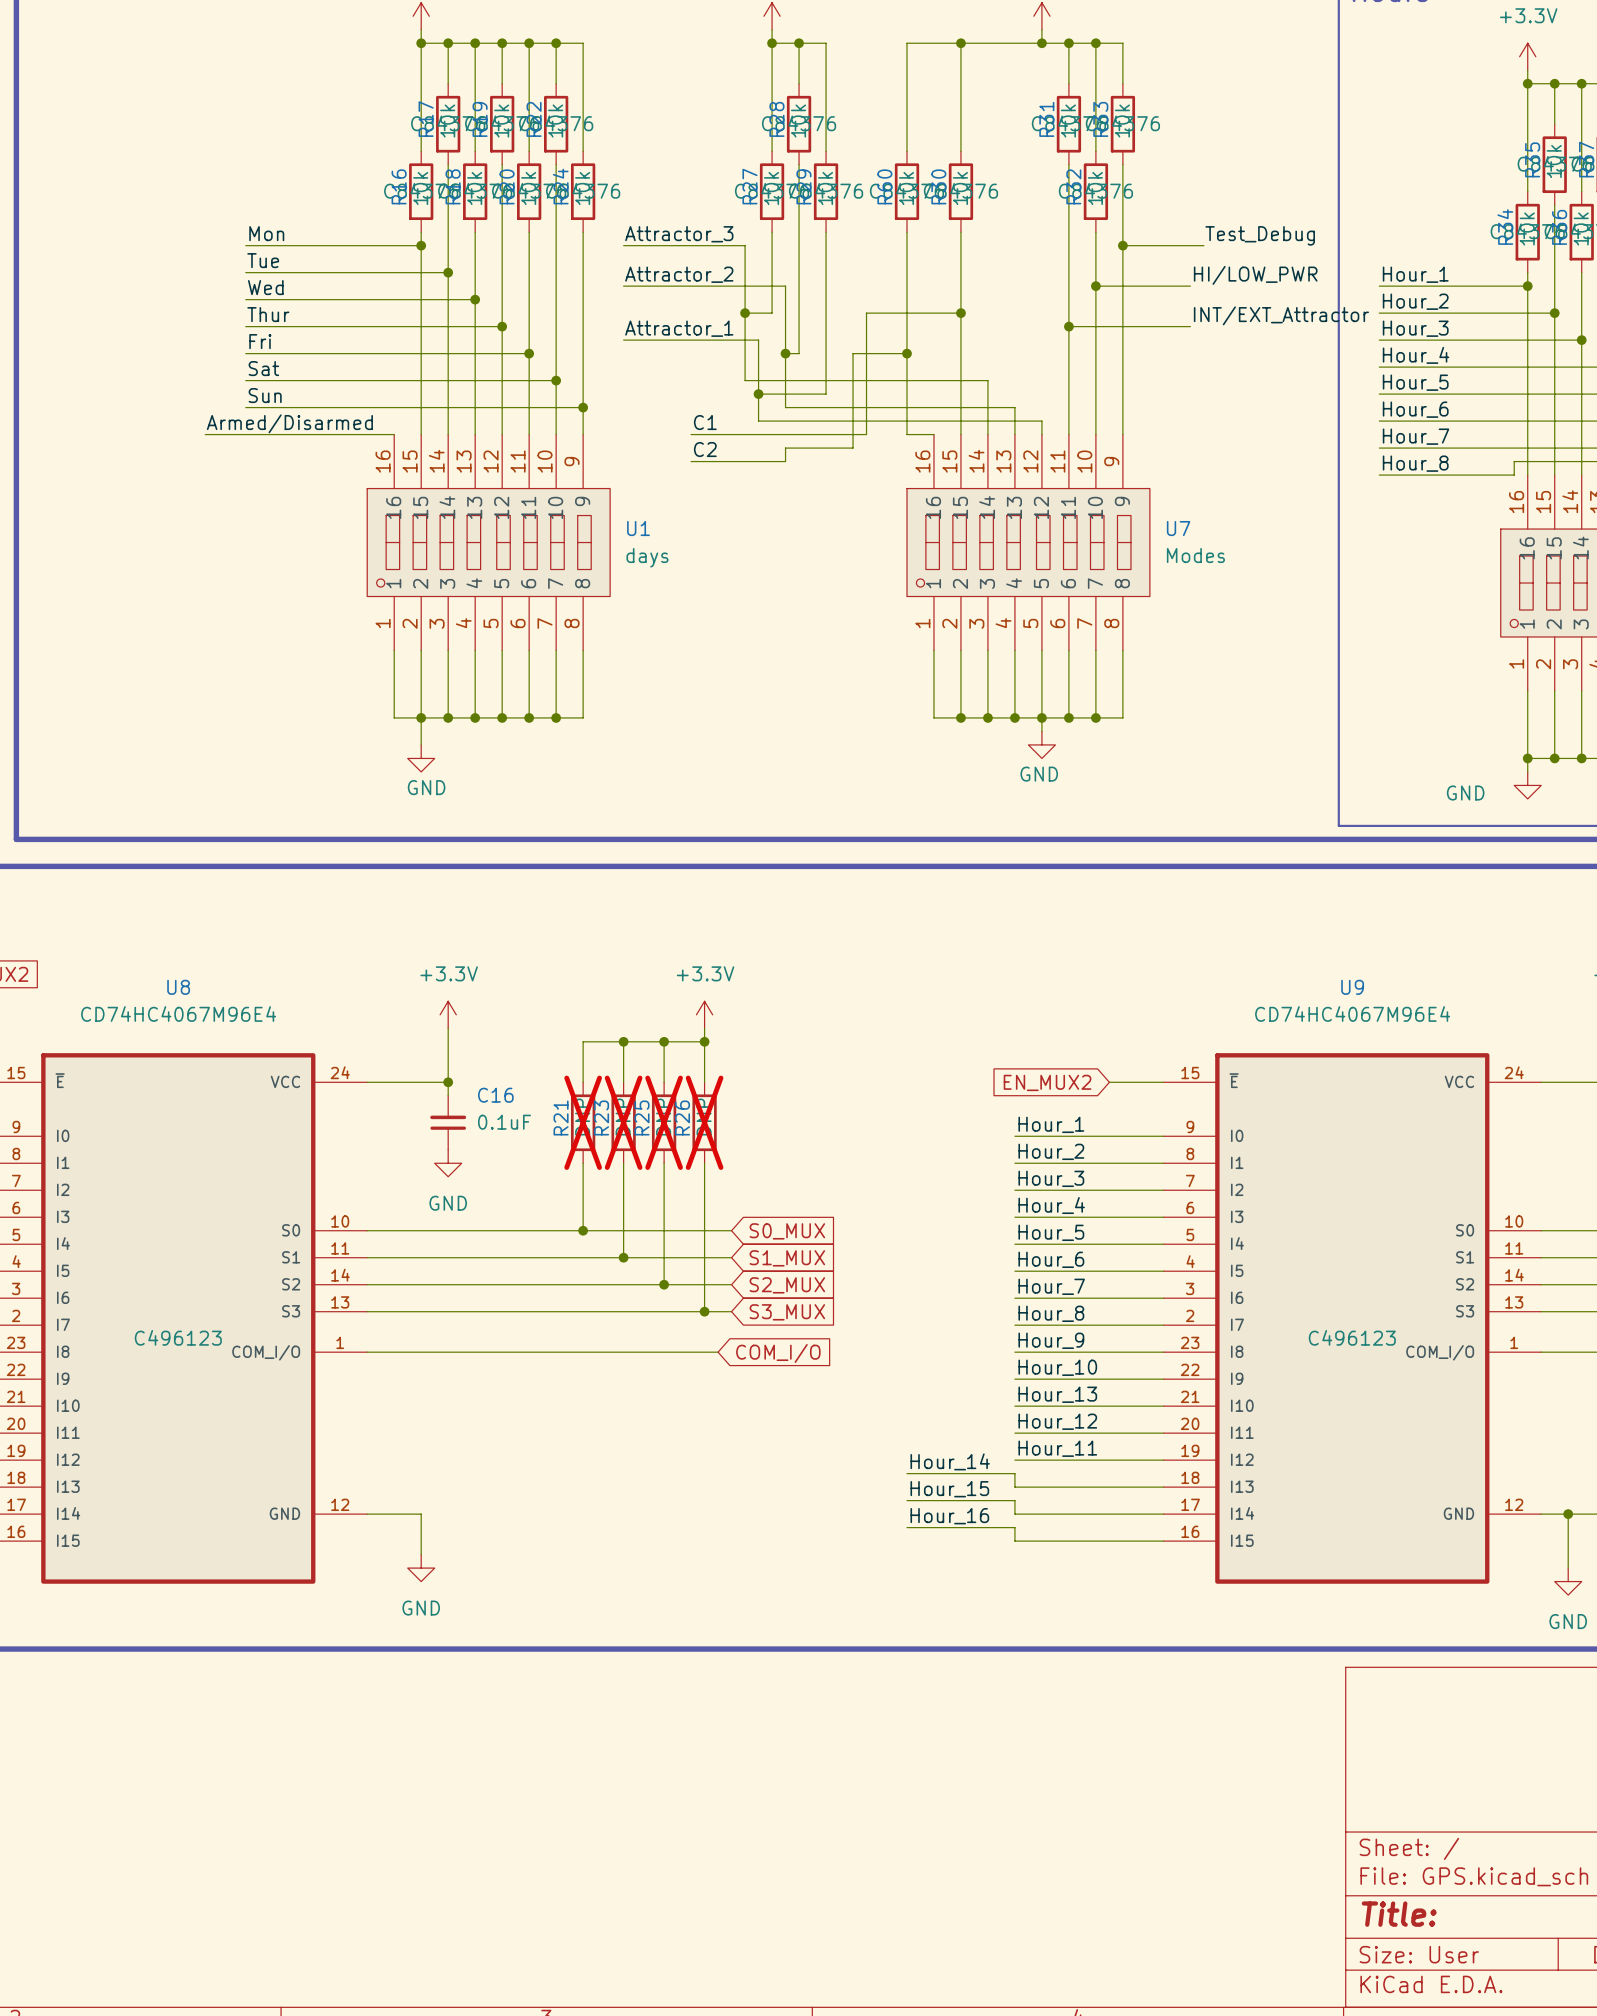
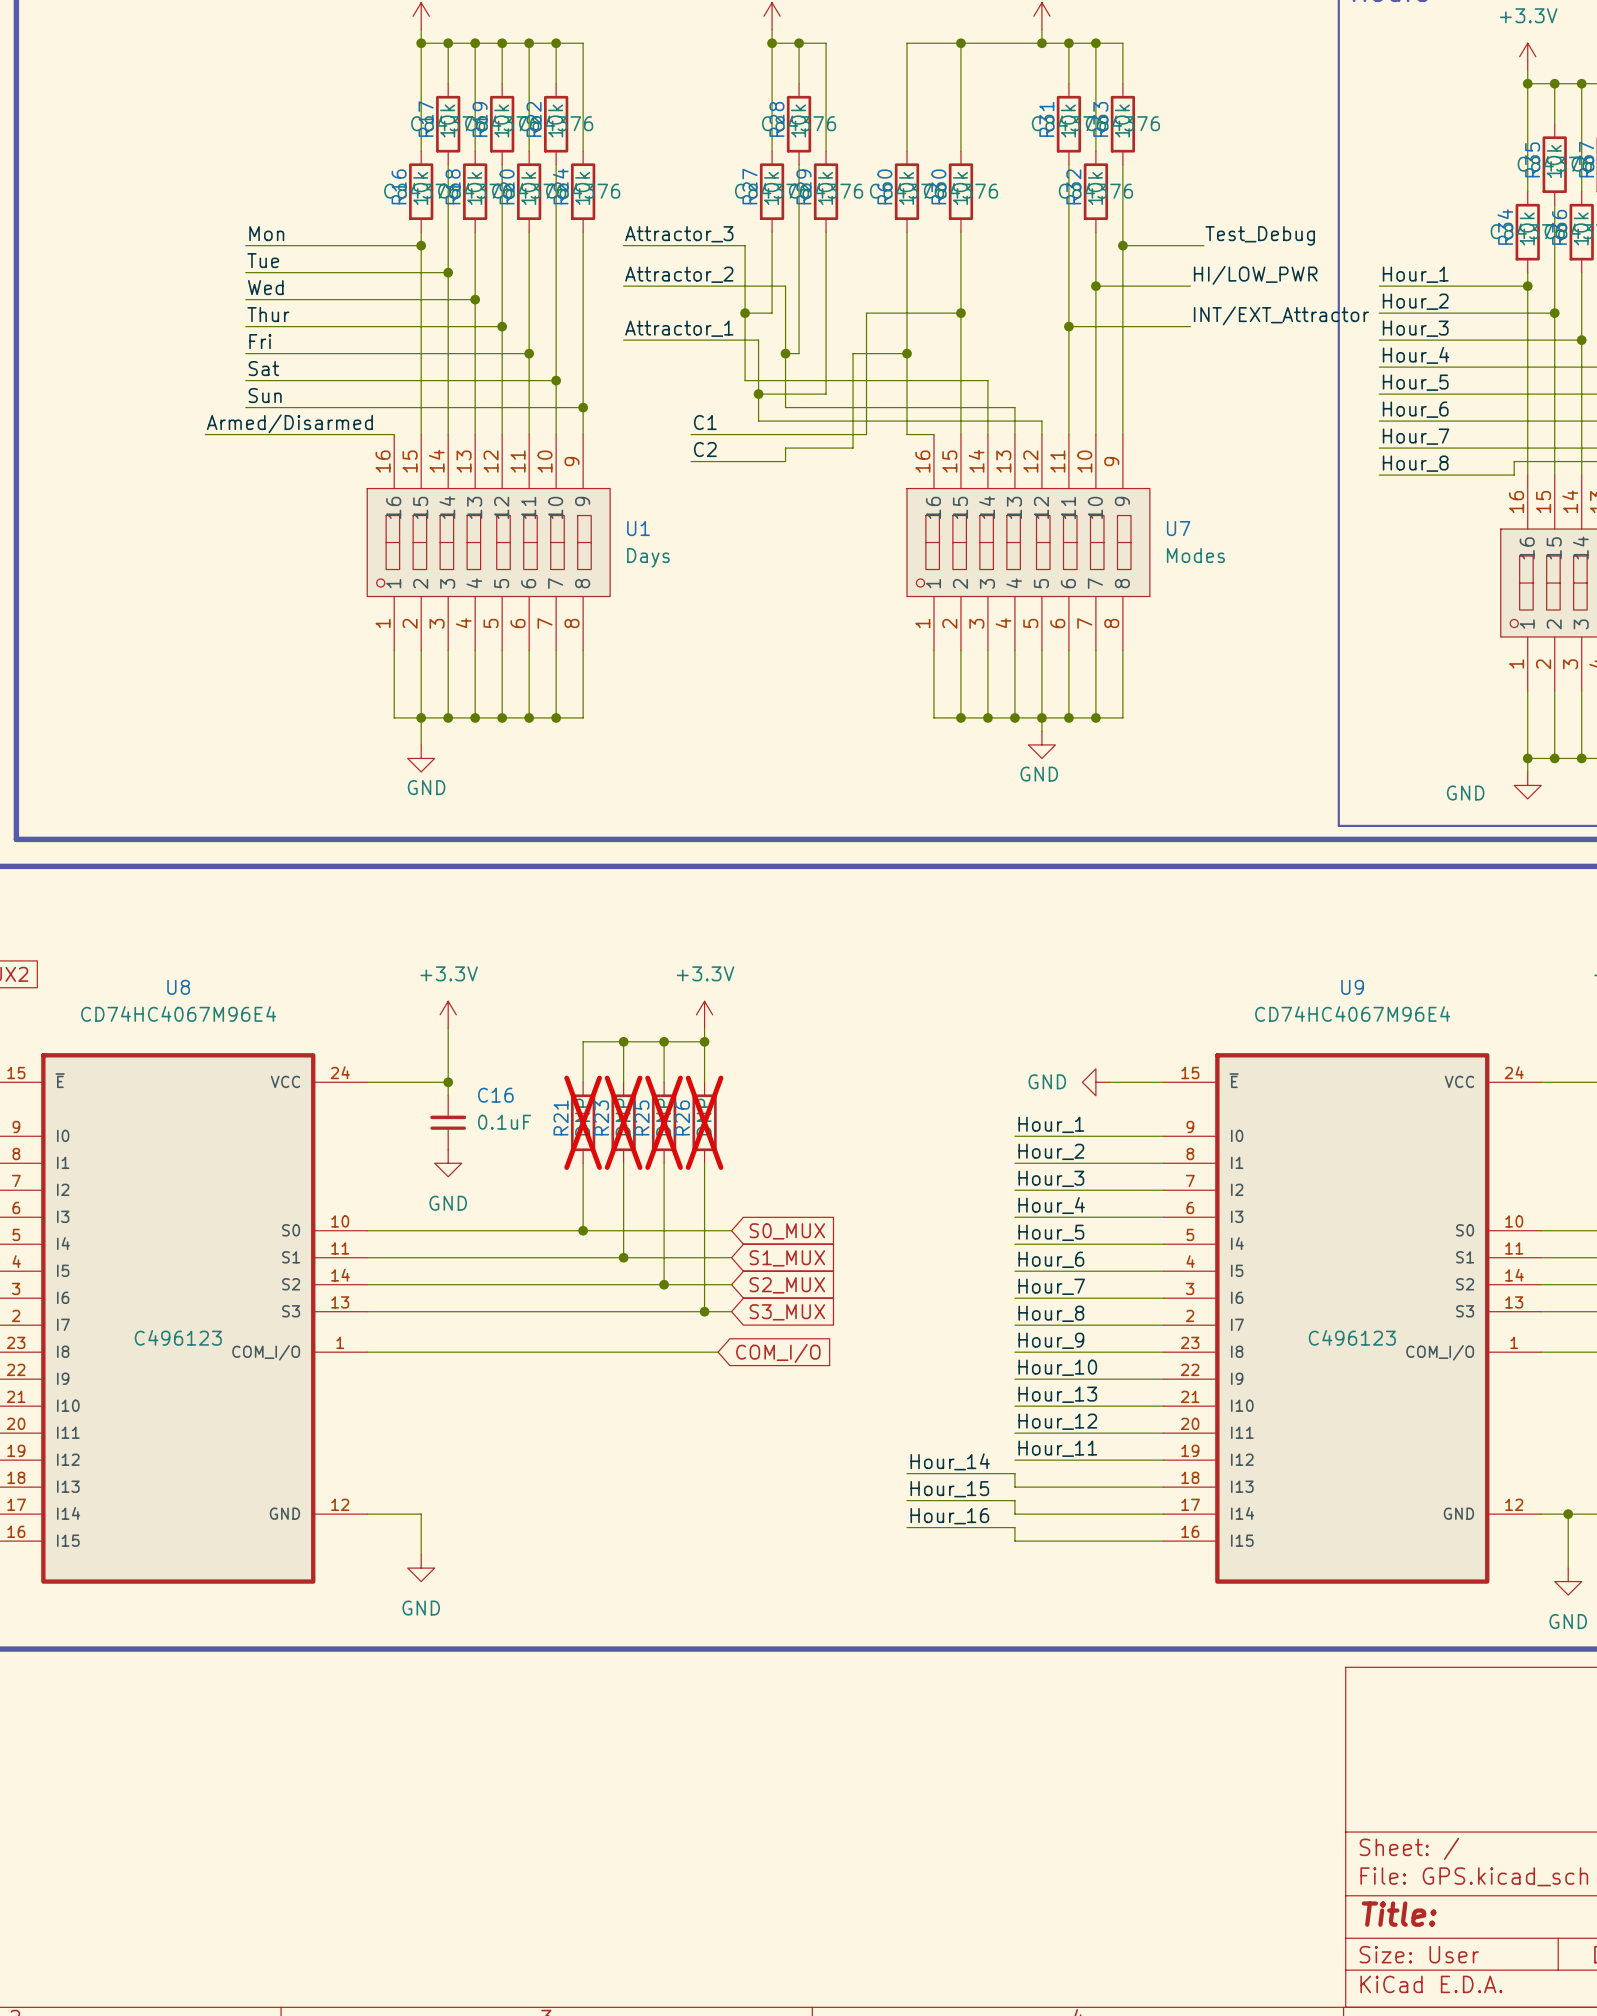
U1 value: days (647, 557) -> Days (648, 557)
global label: EN_MUX2 (1047, 1082) -> none
power symbol: none -> GND (1095, 1082)

